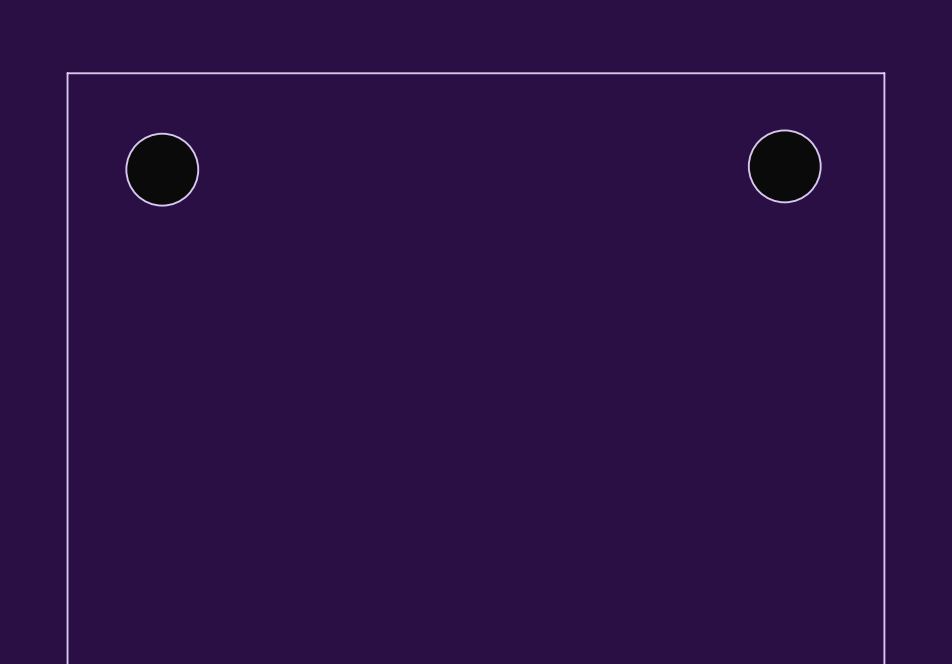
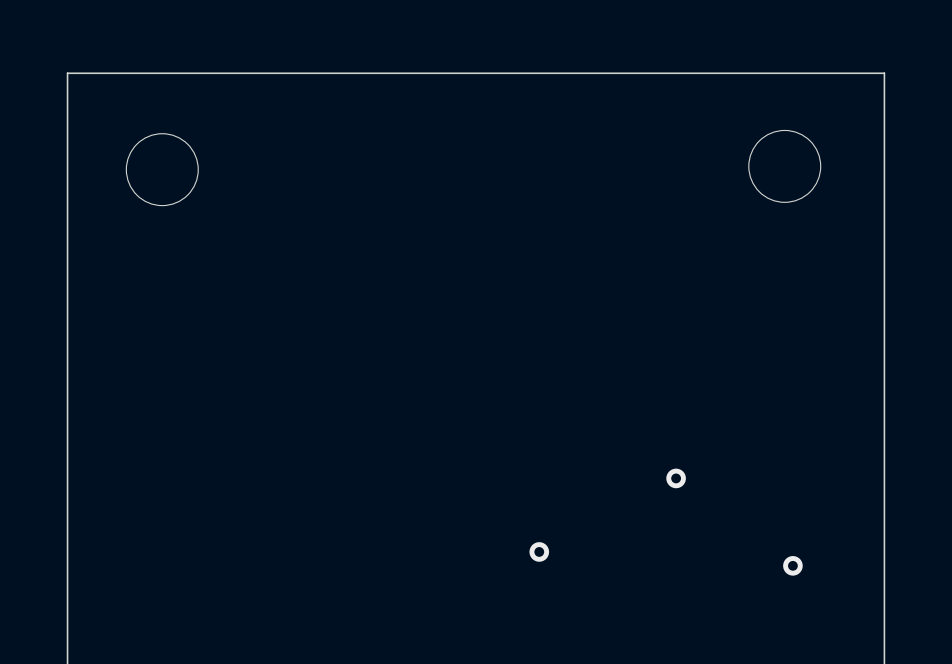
via: none -> (676, 478)
via: none -> (539, 551)
via: none -> (792, 565)

